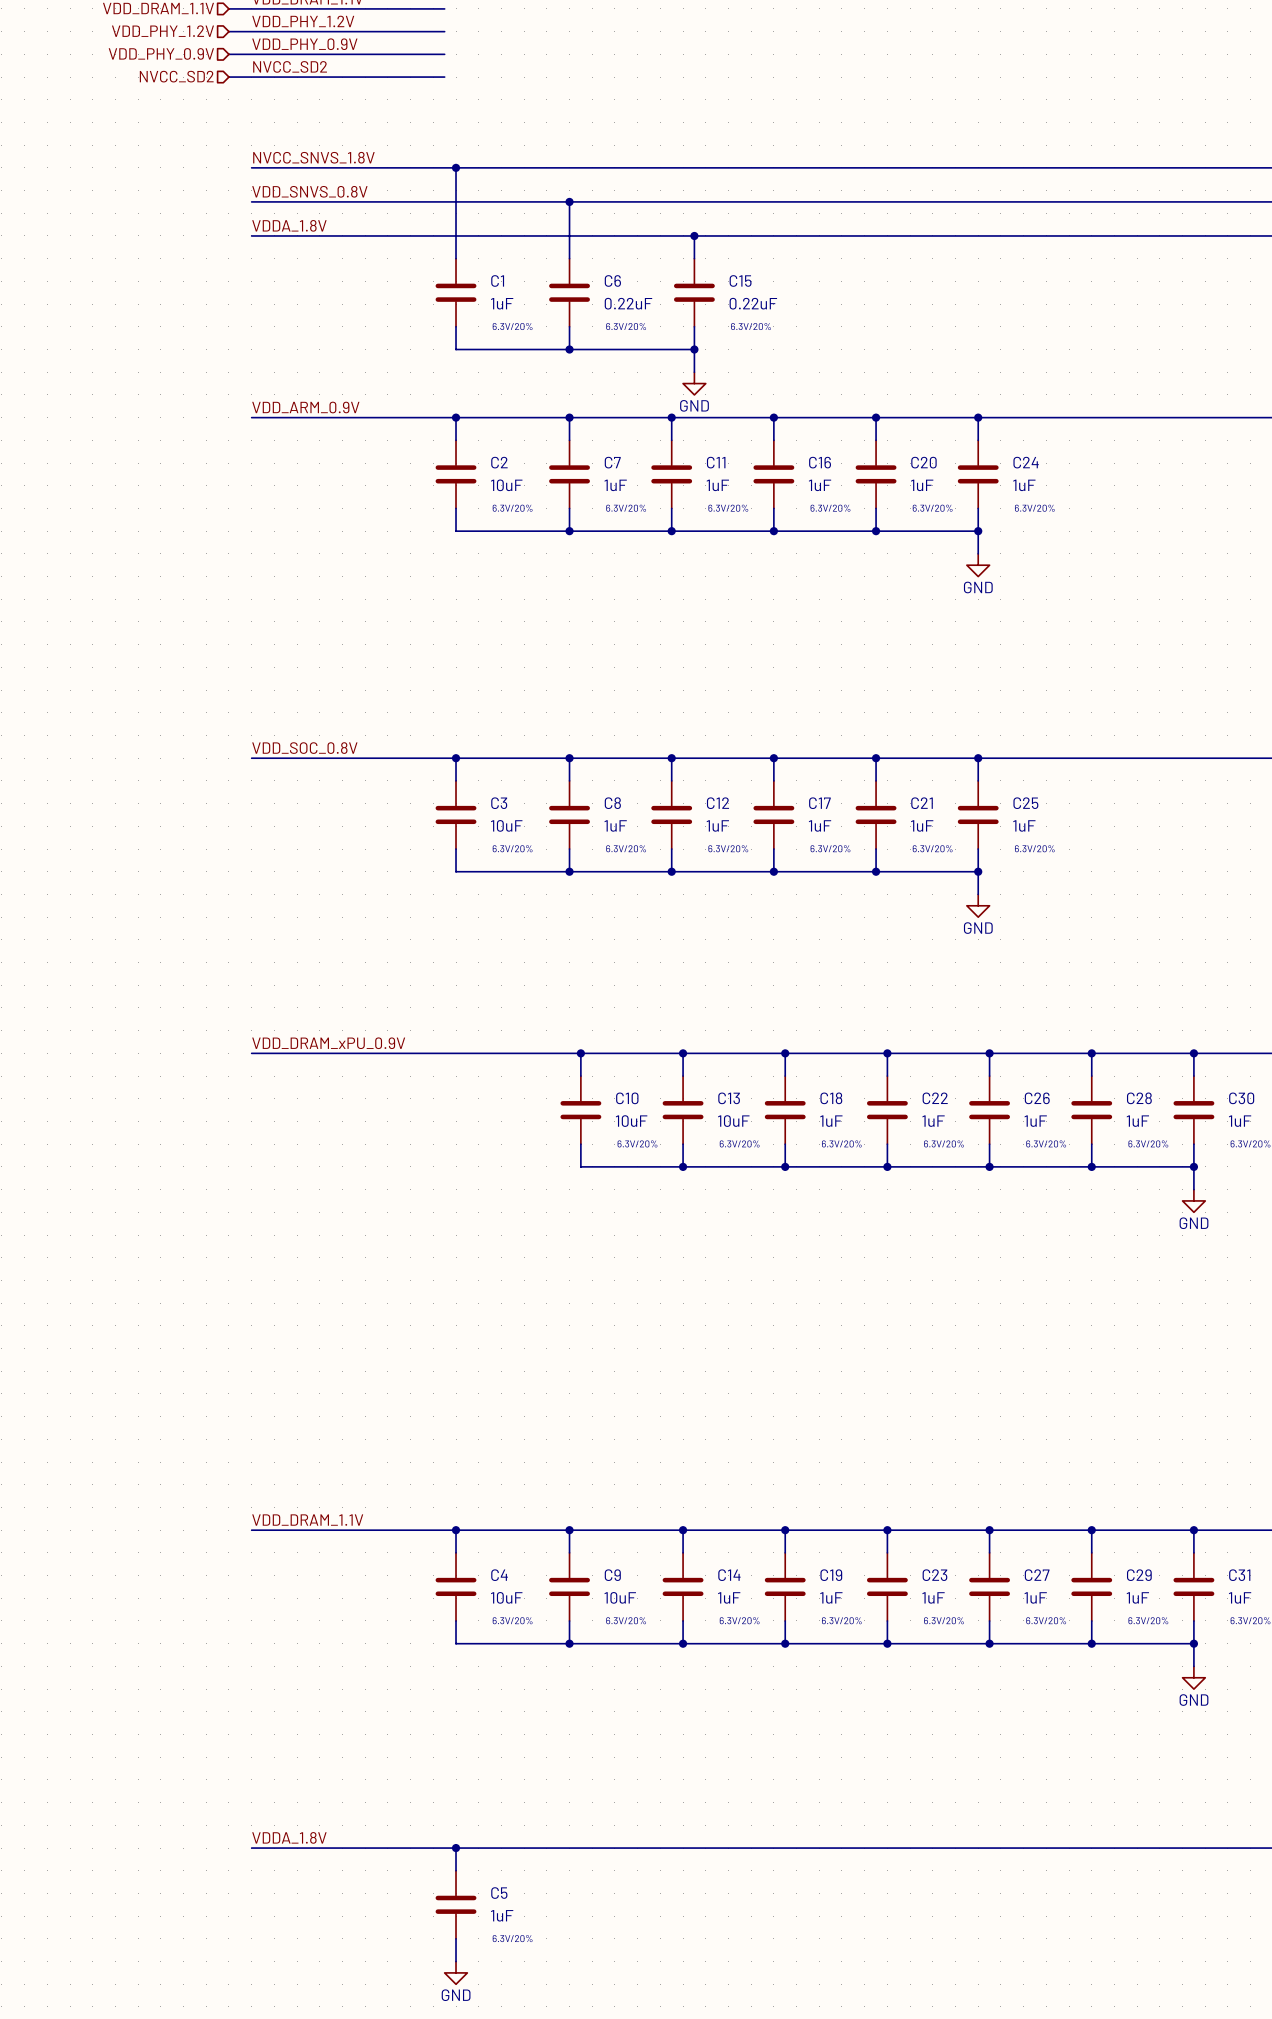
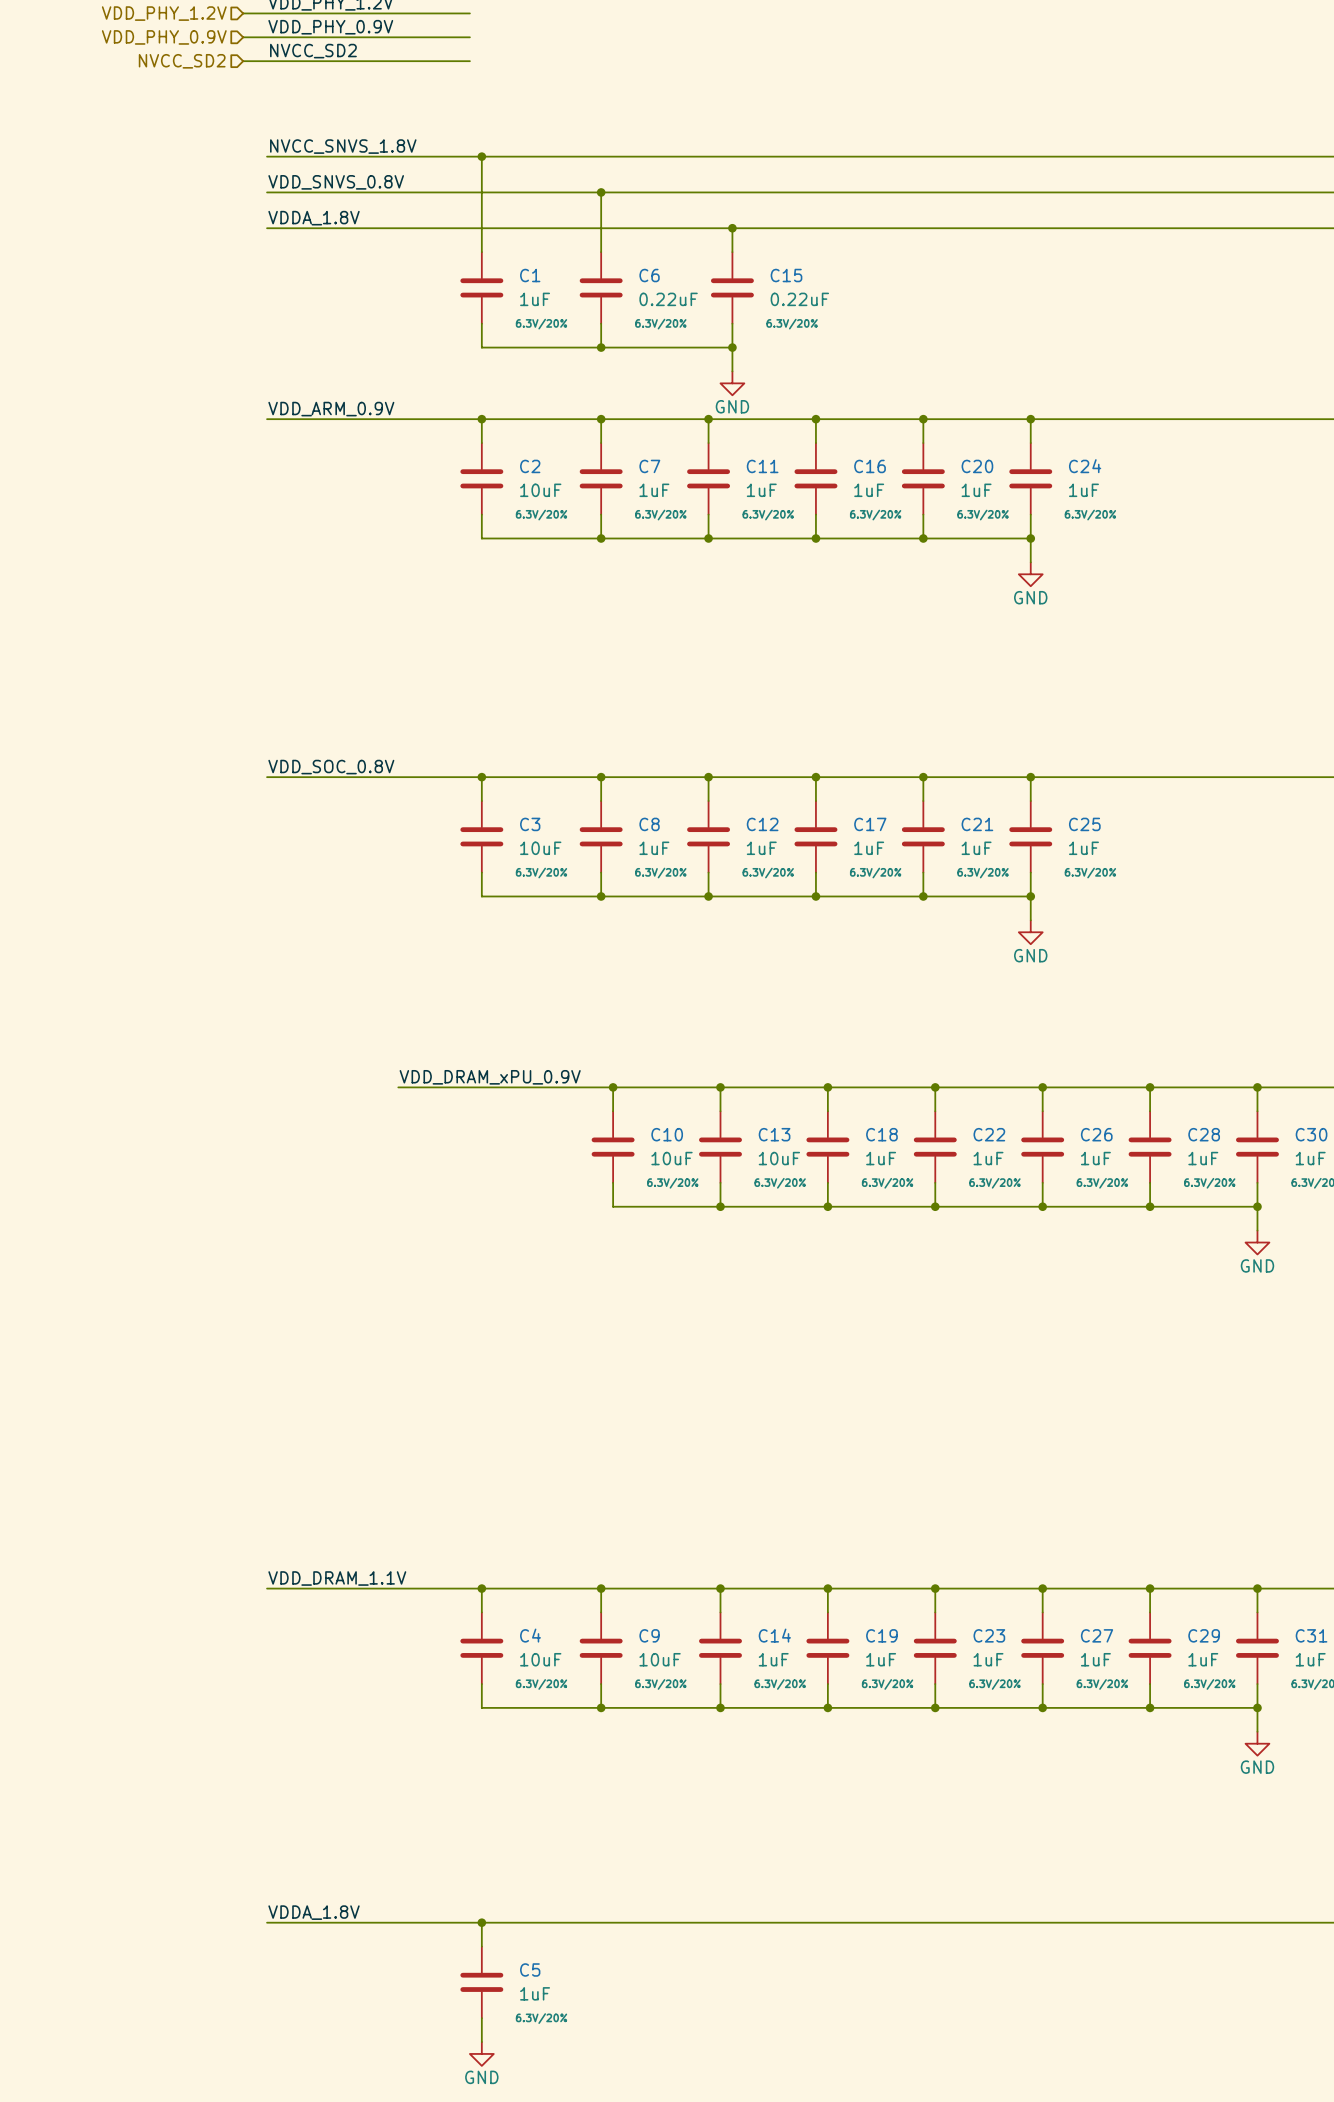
label position: VDD_DRAM_xPU_0.9V (328, 1043) -> VDD_DRAM_xPU_0.9V (490, 1077)
wire: (251, 1053) (376, 1053) -> none

